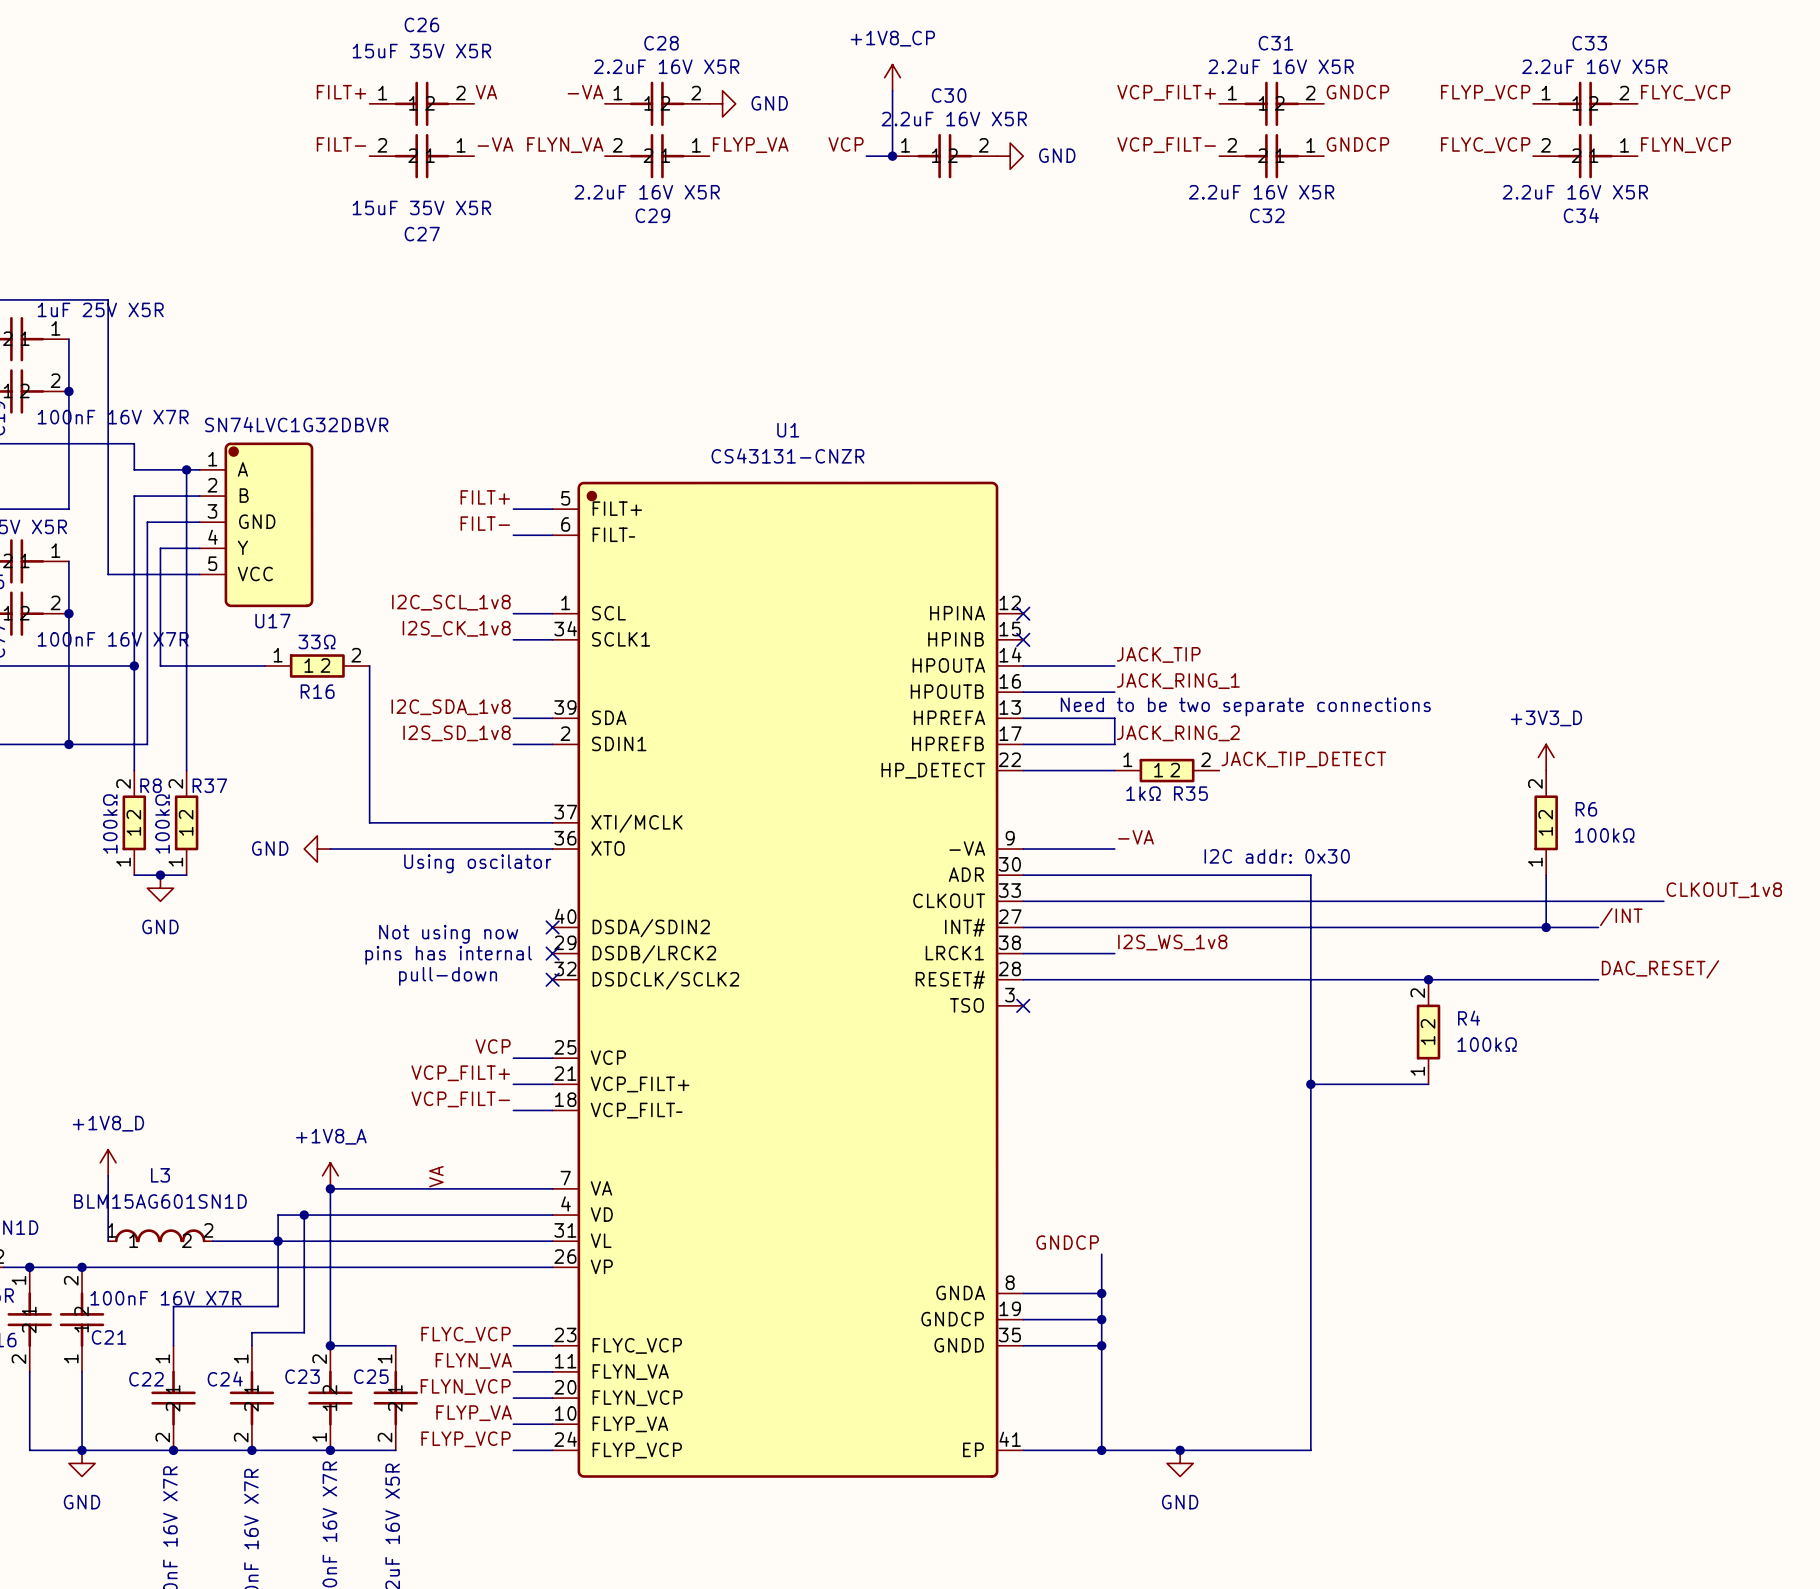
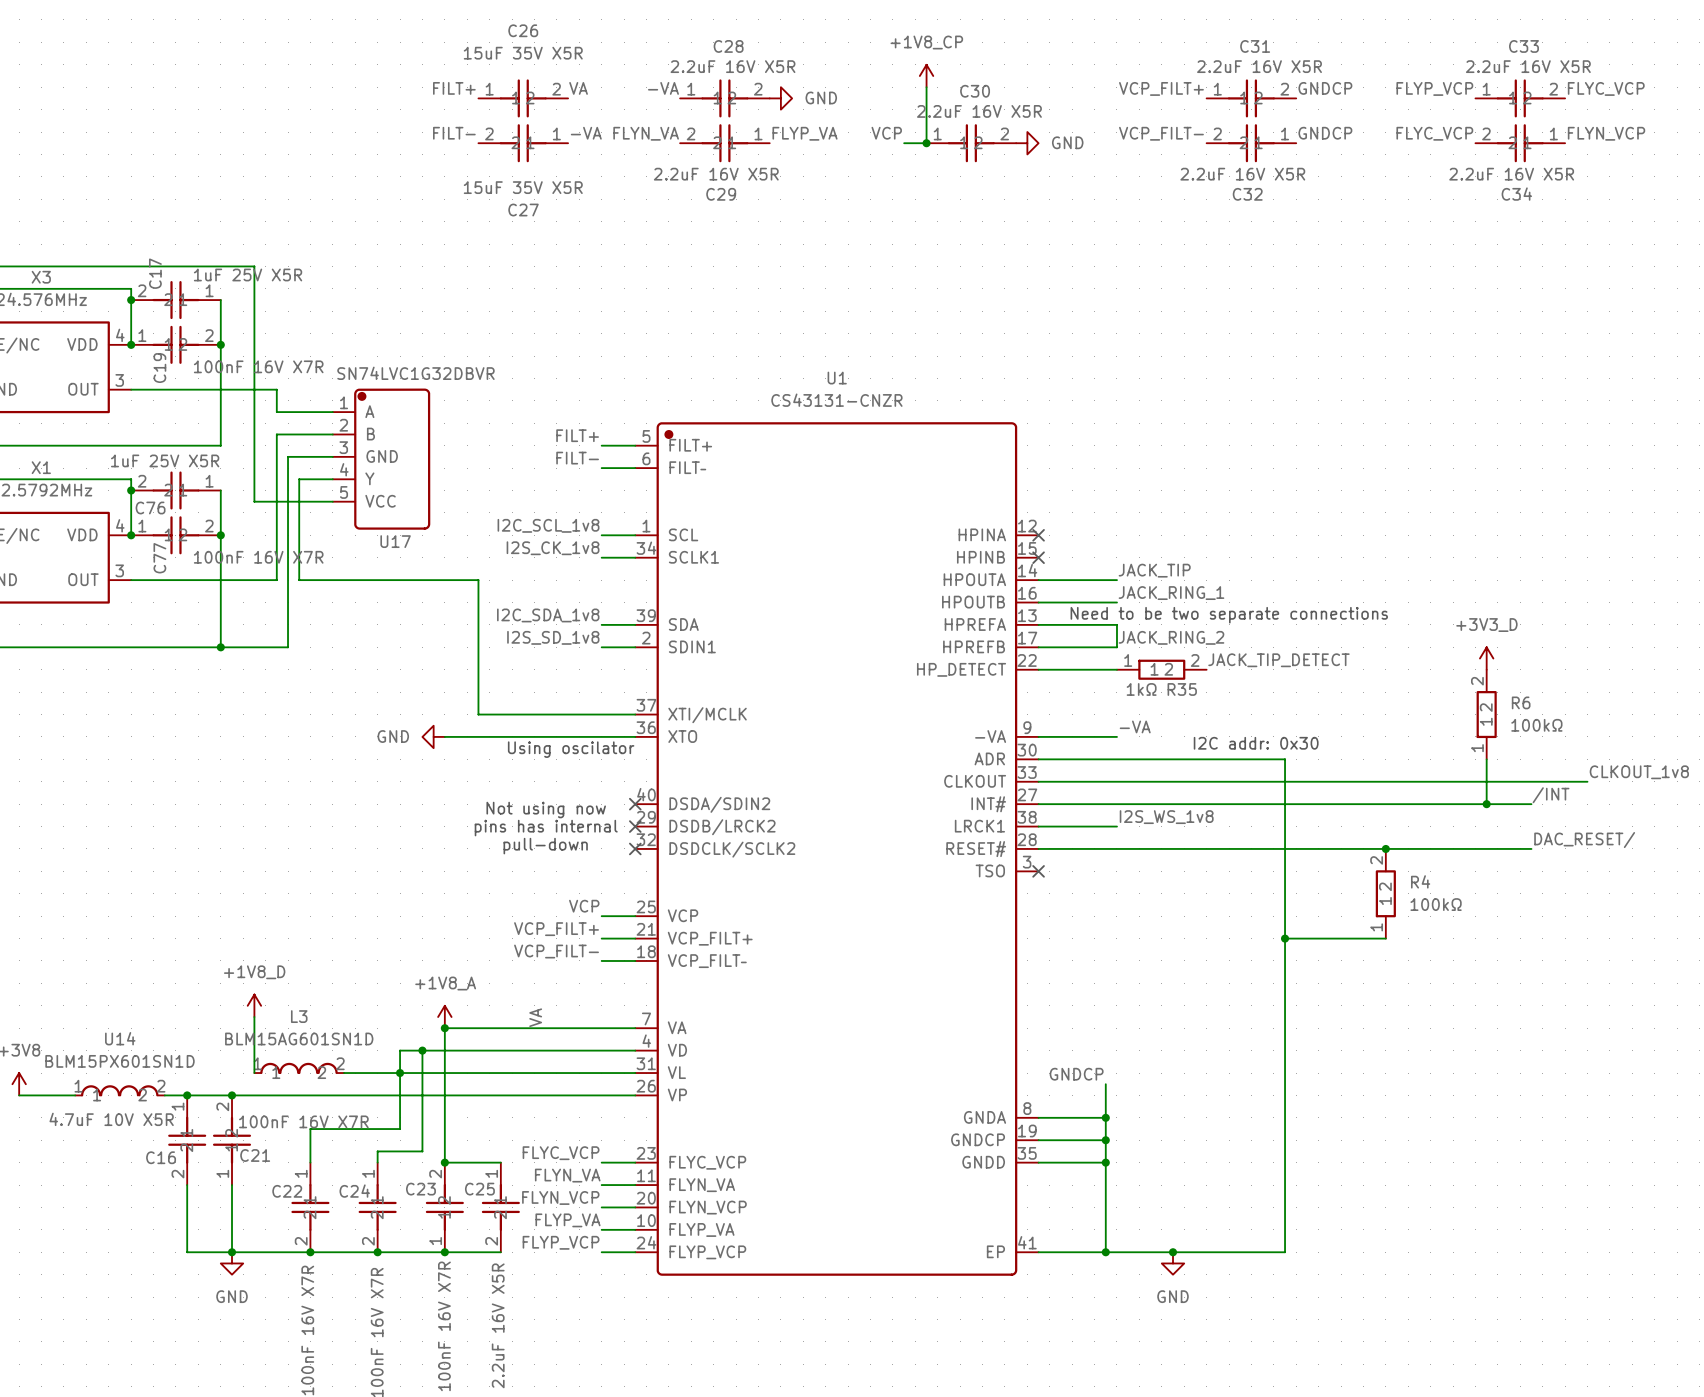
wire: (186, 469) (186, 770) -> none
junction: (186, 469) -> none
wire: (134, 665) (134, 770) -> none
junction: (134, 665) -> none
R16: 33Ω (317, 665) -> none
R8: 100kΩ (134, 822) -> none
R37: 100kΩ (186, 822) -> none
wire: (134, 875) (186, 875) -> none
junction: (160, 875) -> none
power symbol: GND (160, 888) -> none

